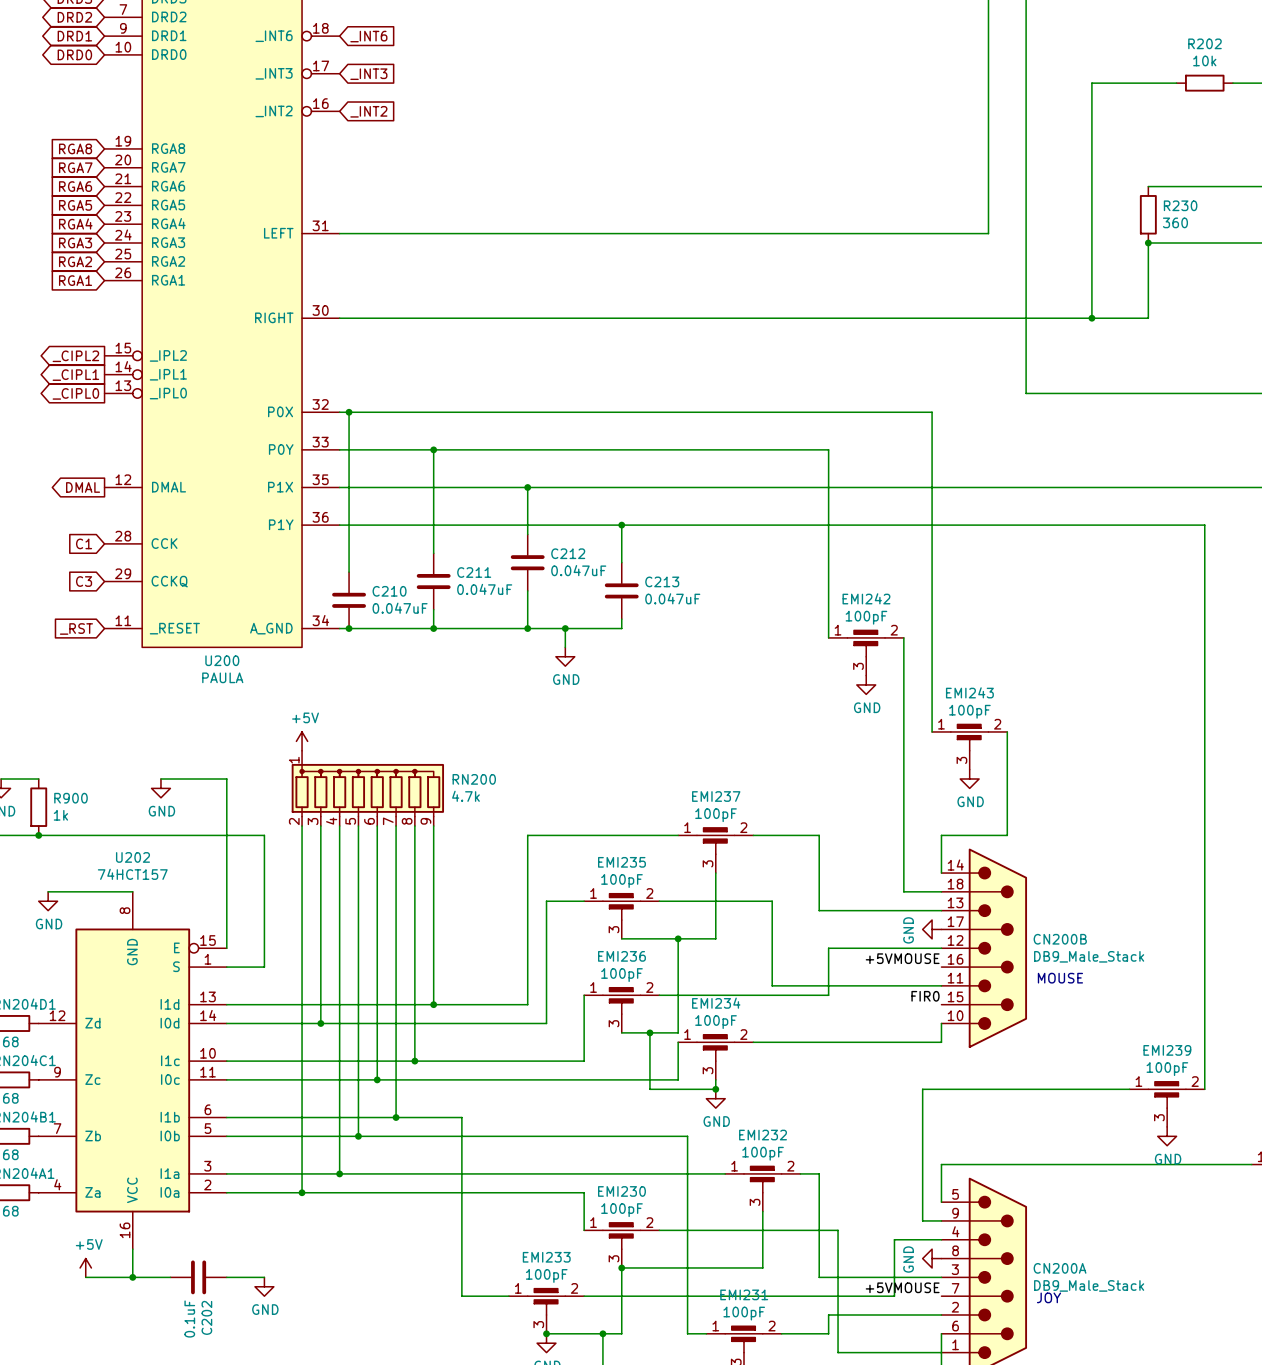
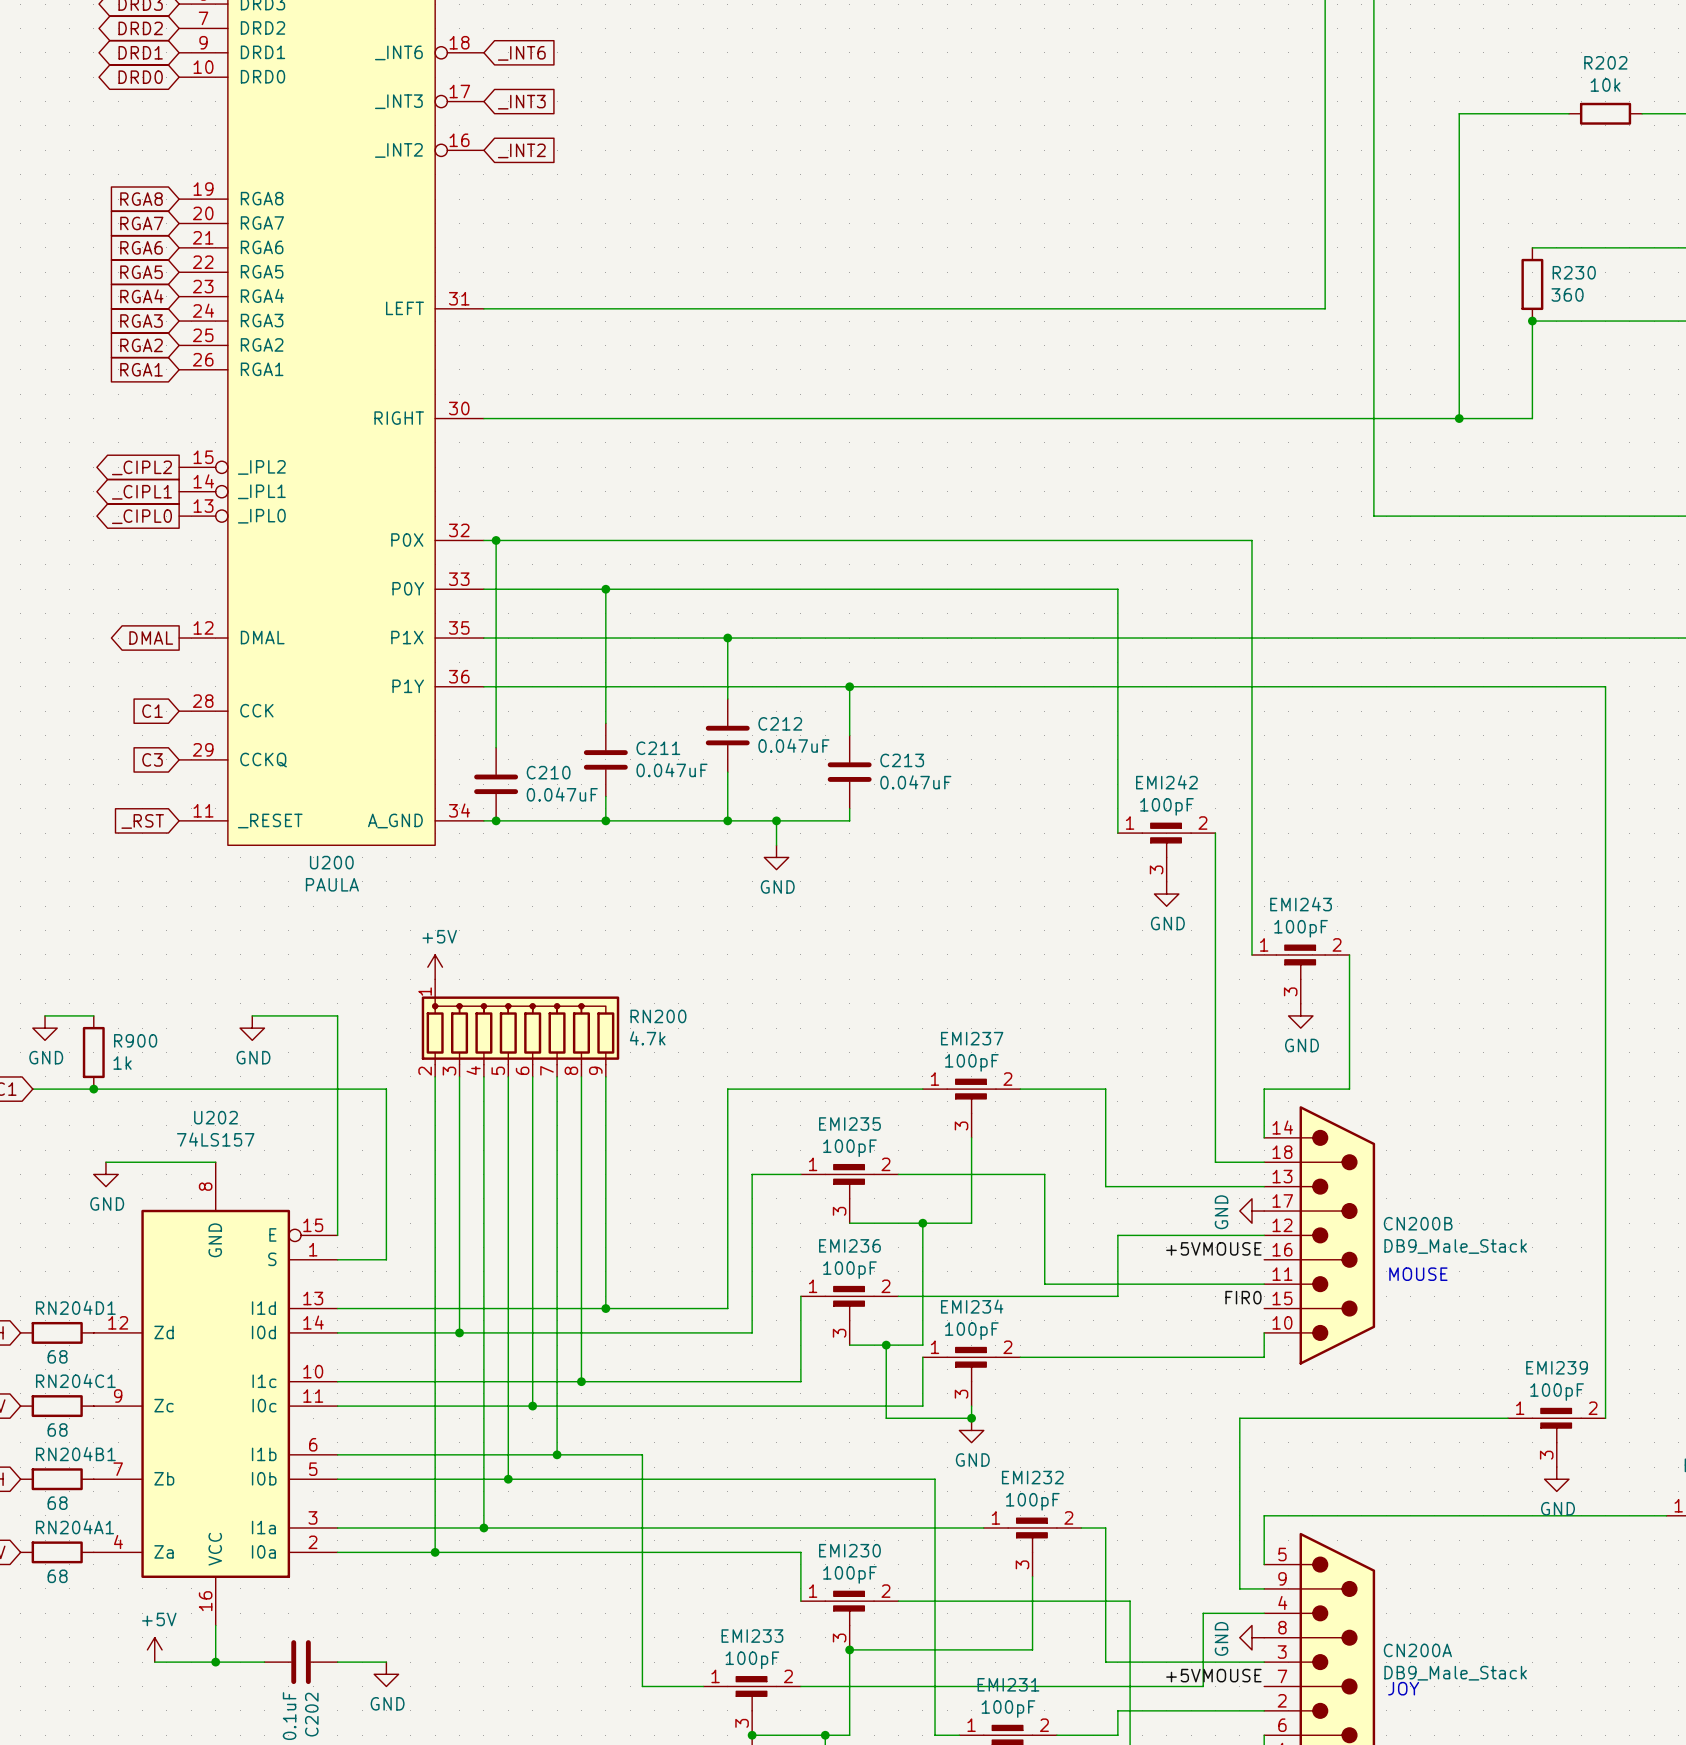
U202 value: 74HCT157 (132, 874) -> 74LS157 (215, 1139)

